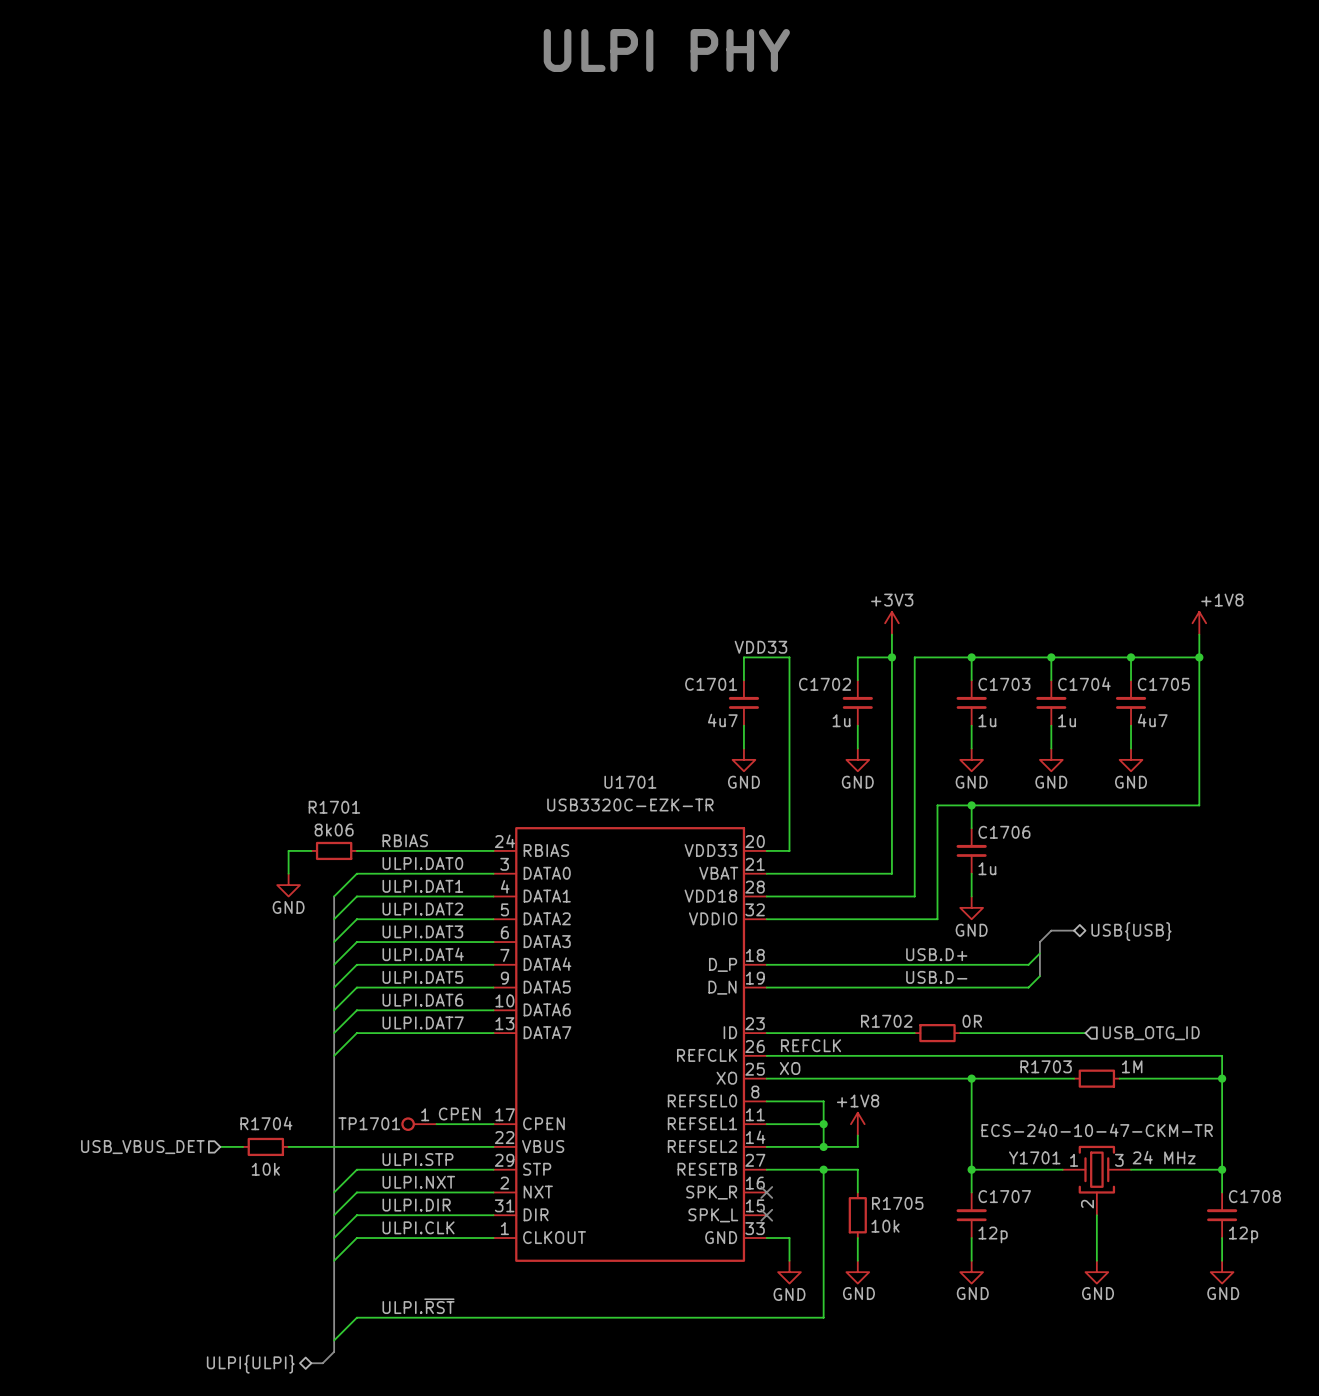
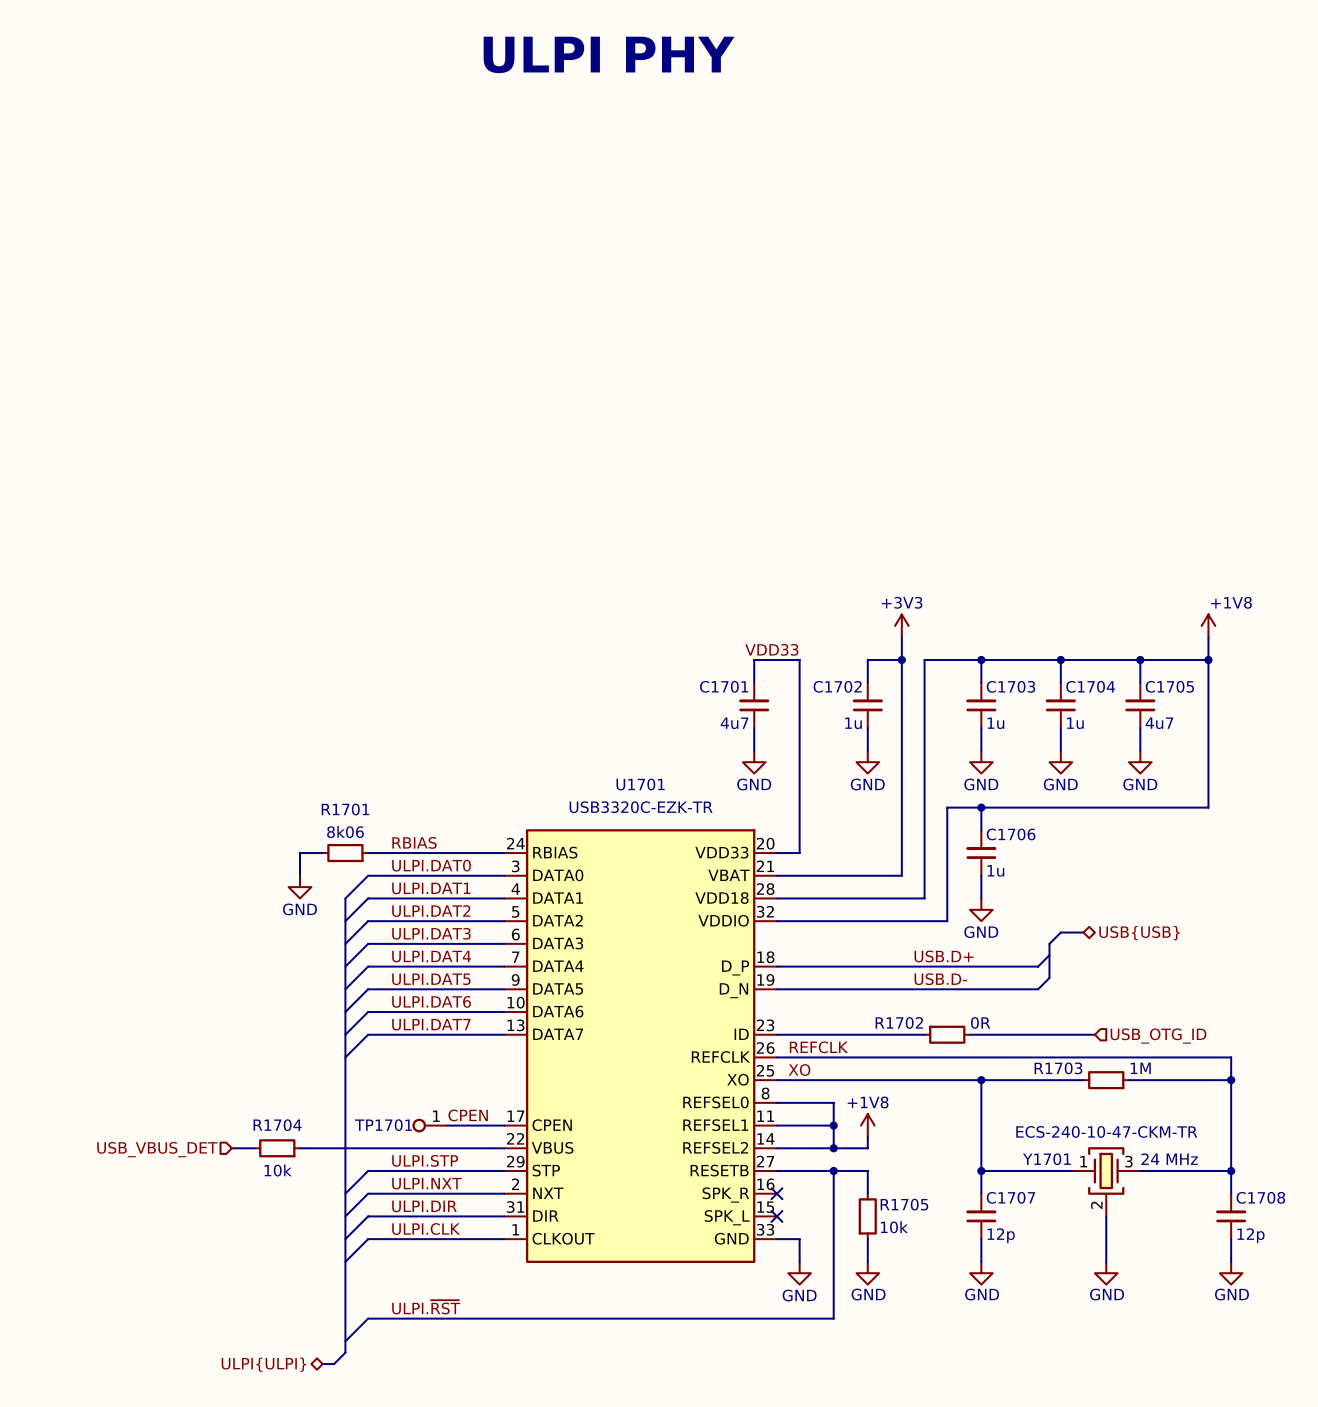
text position: ULPI PHY (666, 50) -> ULPI PHY (609, 54)

